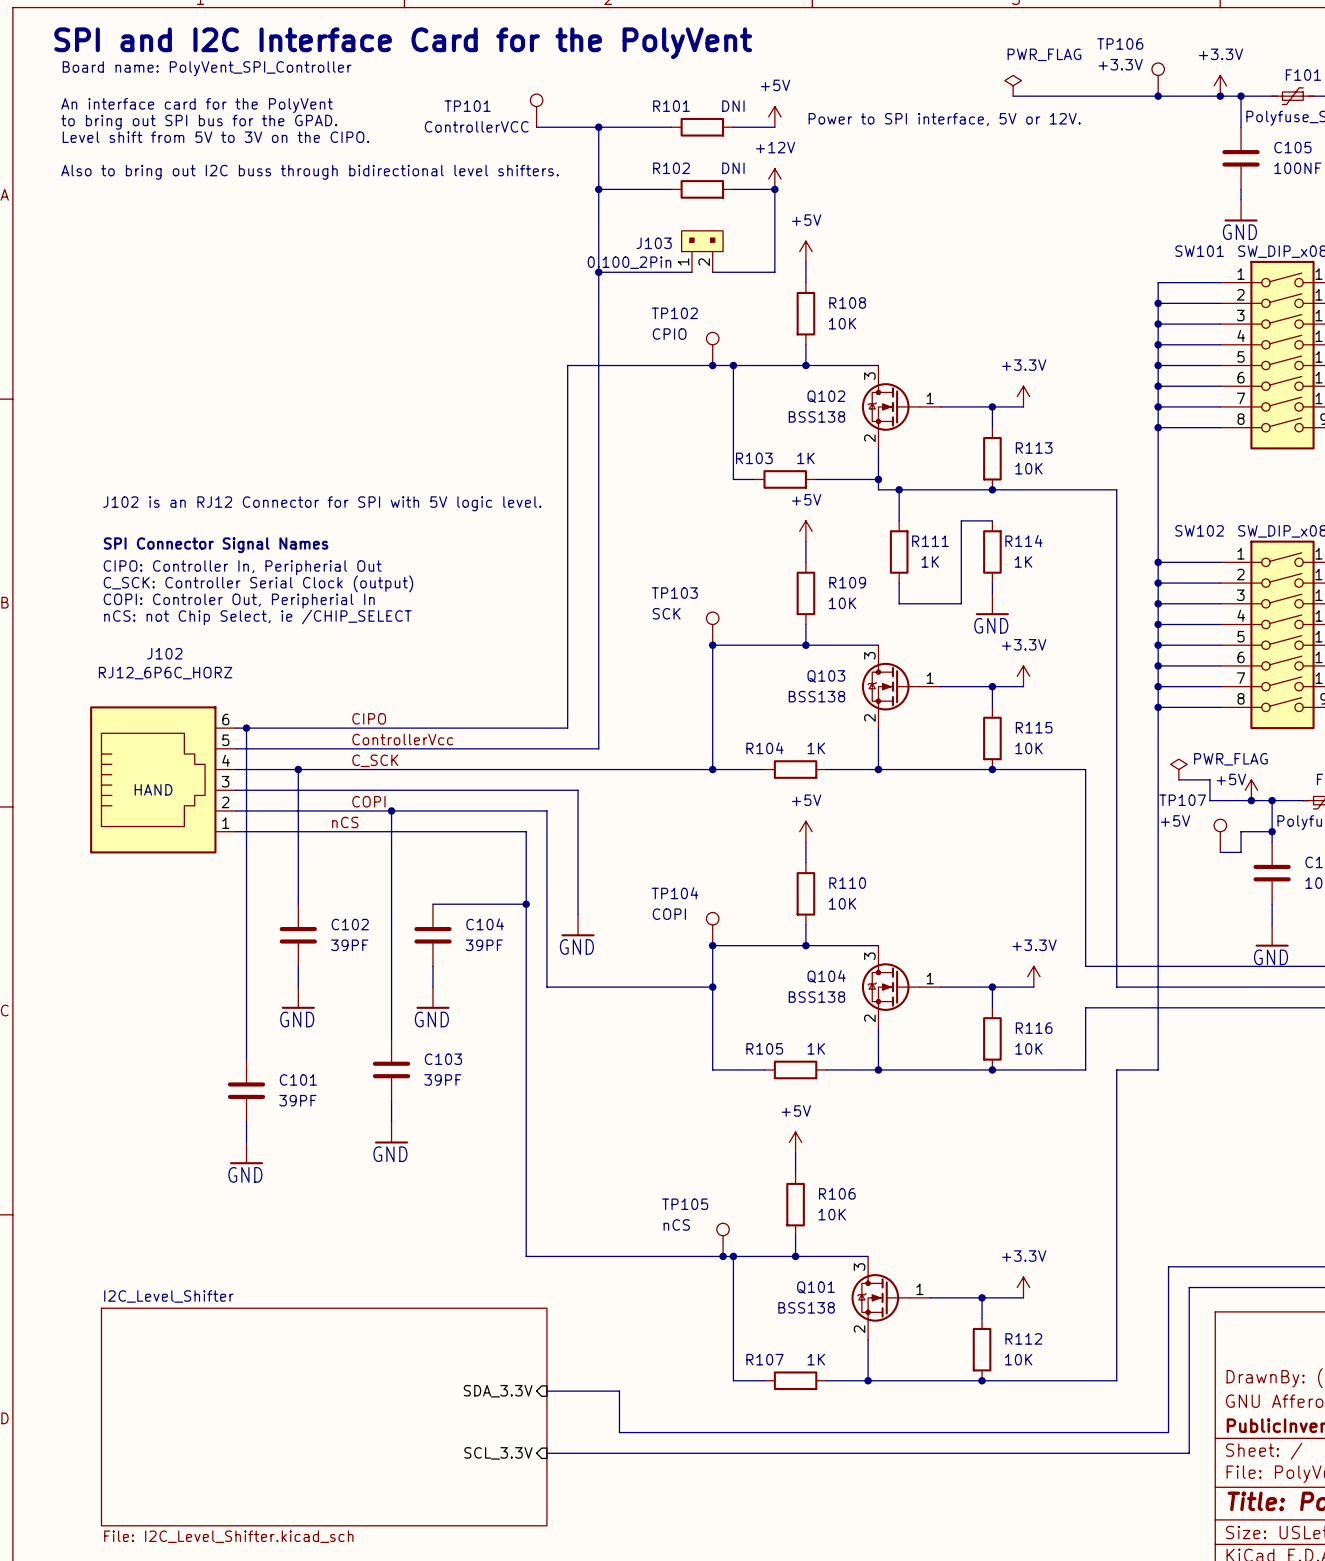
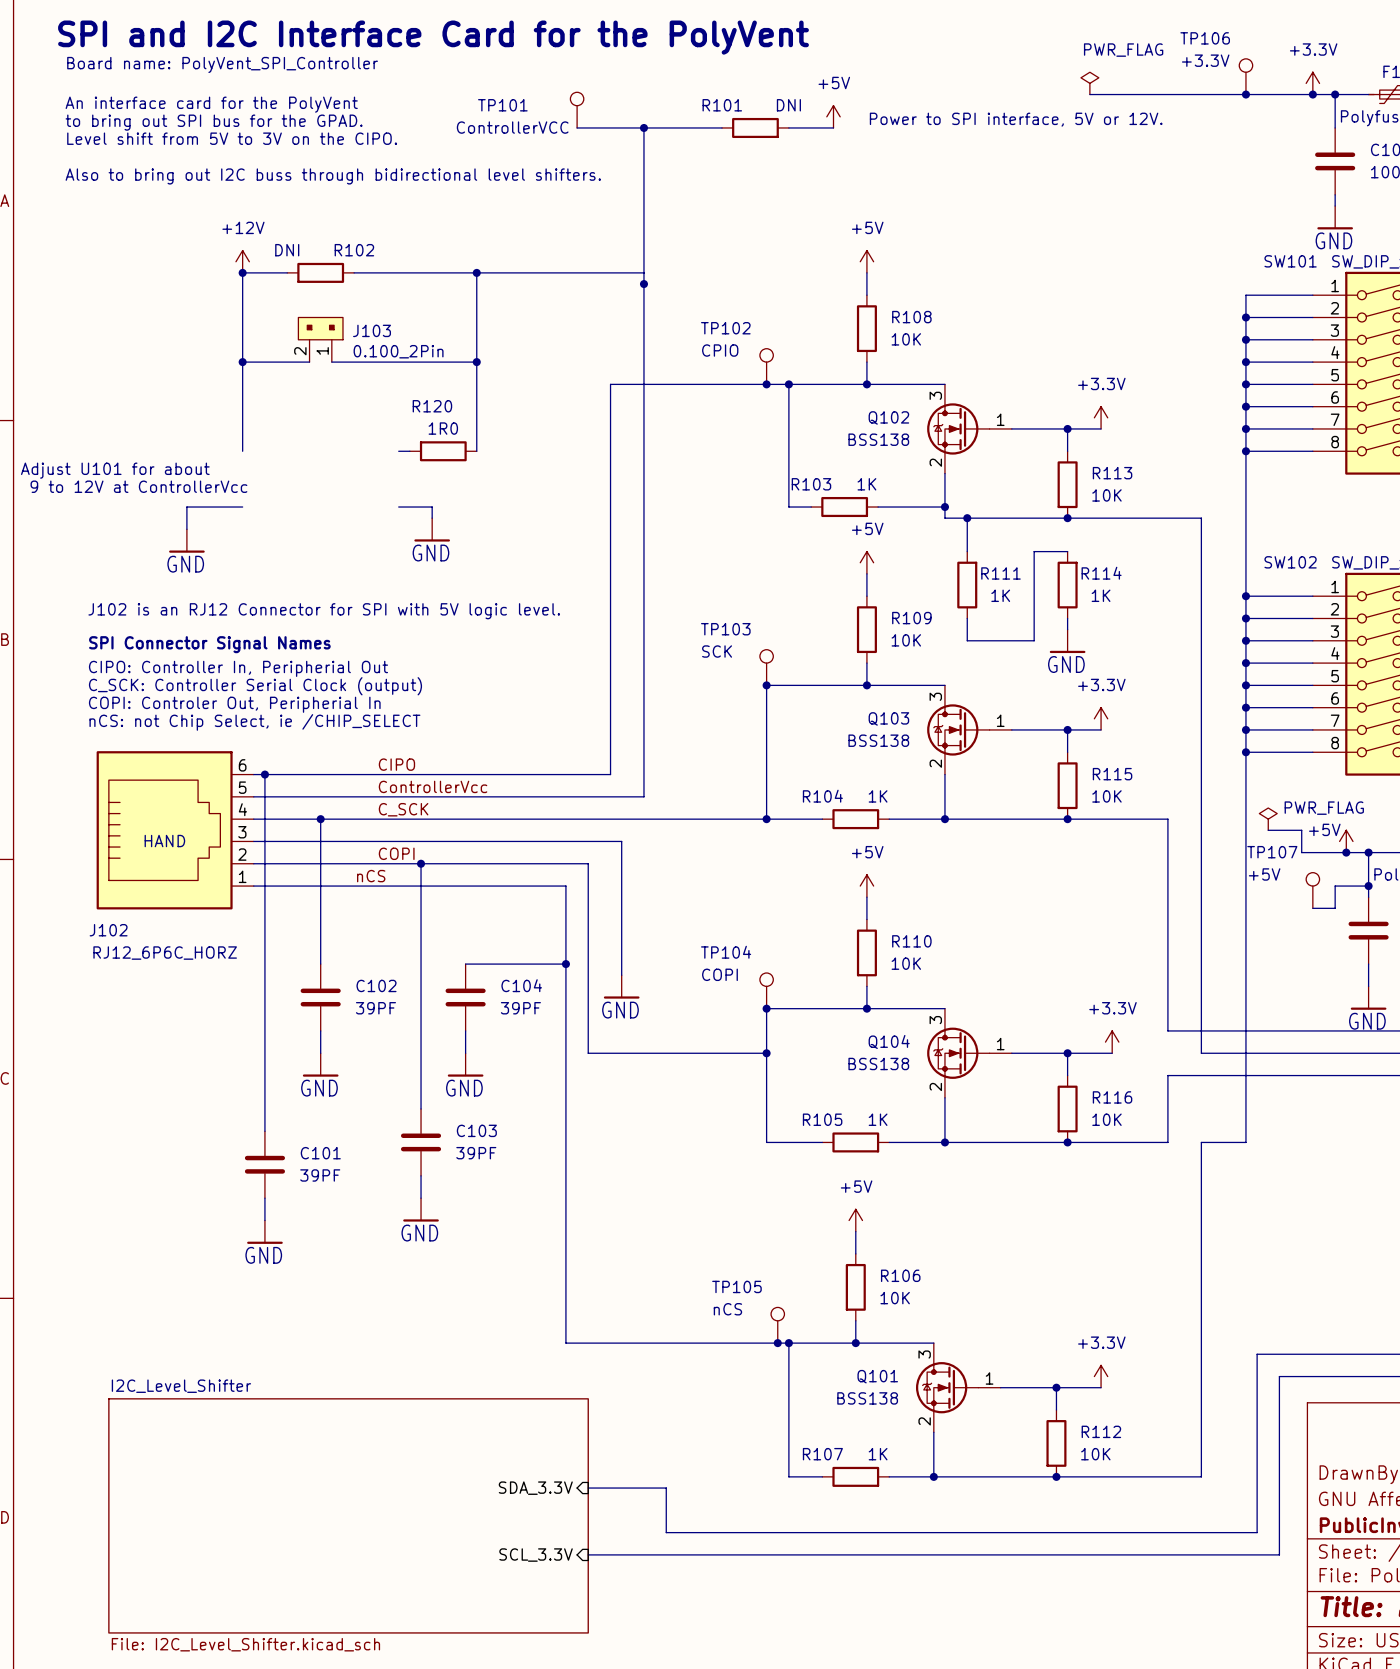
R102 name position: R102 (671, 168) -> R102 (354, 250)
R102 value position: DNI (733, 168) -> DNI (287, 250)
power symbol: +12V (774, 179) -> none
wire: (598, 189) (671, 189) -> none
junction: (598, 189) -> none
R102 position: (702, 189) -> (320, 272)
wire: (733, 189) (774, 189) (774, 272) (712, 272) -> none
junction: (774, 189) -> none
J103 flip: as is (702, 241) -> left-right (320, 328)
power symbol: none -> +12V (242, 261)
J103 position: (702, 251) -> (320, 339)
junction: none -> (242, 272)
wire: none -> (287, 272) (242, 272) (242, 451)
wire: none -> (354, 272) (643, 272)
wire: none -> (476, 272) (476, 451)
junction: none -> (476, 272)
wire: (598, 272) (691, 272) -> none
wire: none -> (242, 362) (309, 362)
junction: none -> (242, 362)
wire: none -> (331, 362) (476, 362)
junction: none -> (476, 362)
wire: none -> (398, 451) (409, 451)
R120: none -> 1R0 (443, 451)
text: none -> Adjust U101 for about (115, 470)
text: none -> 9 to 12V at ControllerVcc (138, 486)
wire: none -> (242, 507) (186, 507) (186, 529)
wire: none -> (398, 507) (432, 507) (432, 518)
power symbol: none -> GND (432, 529)
text position: J102 is an RJ12 Connector for SPI with 5V logic level. (322, 503) -> J102 is an RJ12 Connector for SPI with 5V logic level. (324, 611)
power symbol: none -> GND (186, 541)
text position: SPI Connector Signal Names (216, 545) -> SPI Connector Signal Names (209, 644)
text position: CIPO: Controller In, Peripherial Out (242, 567) -> CIPO: Controller In, Peripherial Out (238, 668)
text position: C_SCK: Controller Serial Clock (output) (258, 583) -> C_SCK: Controller Serial Clock (output) (255, 686)
text position: COPI: Controler Out, Peripherial In (239, 601) -> COPI: Controler Out, Peripherial In (234, 704)
text position: nCS: not Chip Select, ie /CHIP_SELECT (257, 617) -> nCS: not Chip Select, ie /CHIP_SELECT (254, 722)
J102 name position: J102 (164, 653) -> J102 (108, 930)
J102 value position: RJ12_6P6C_HORZ (165, 673) -> RJ12_6P6C_HORZ (165, 953)

